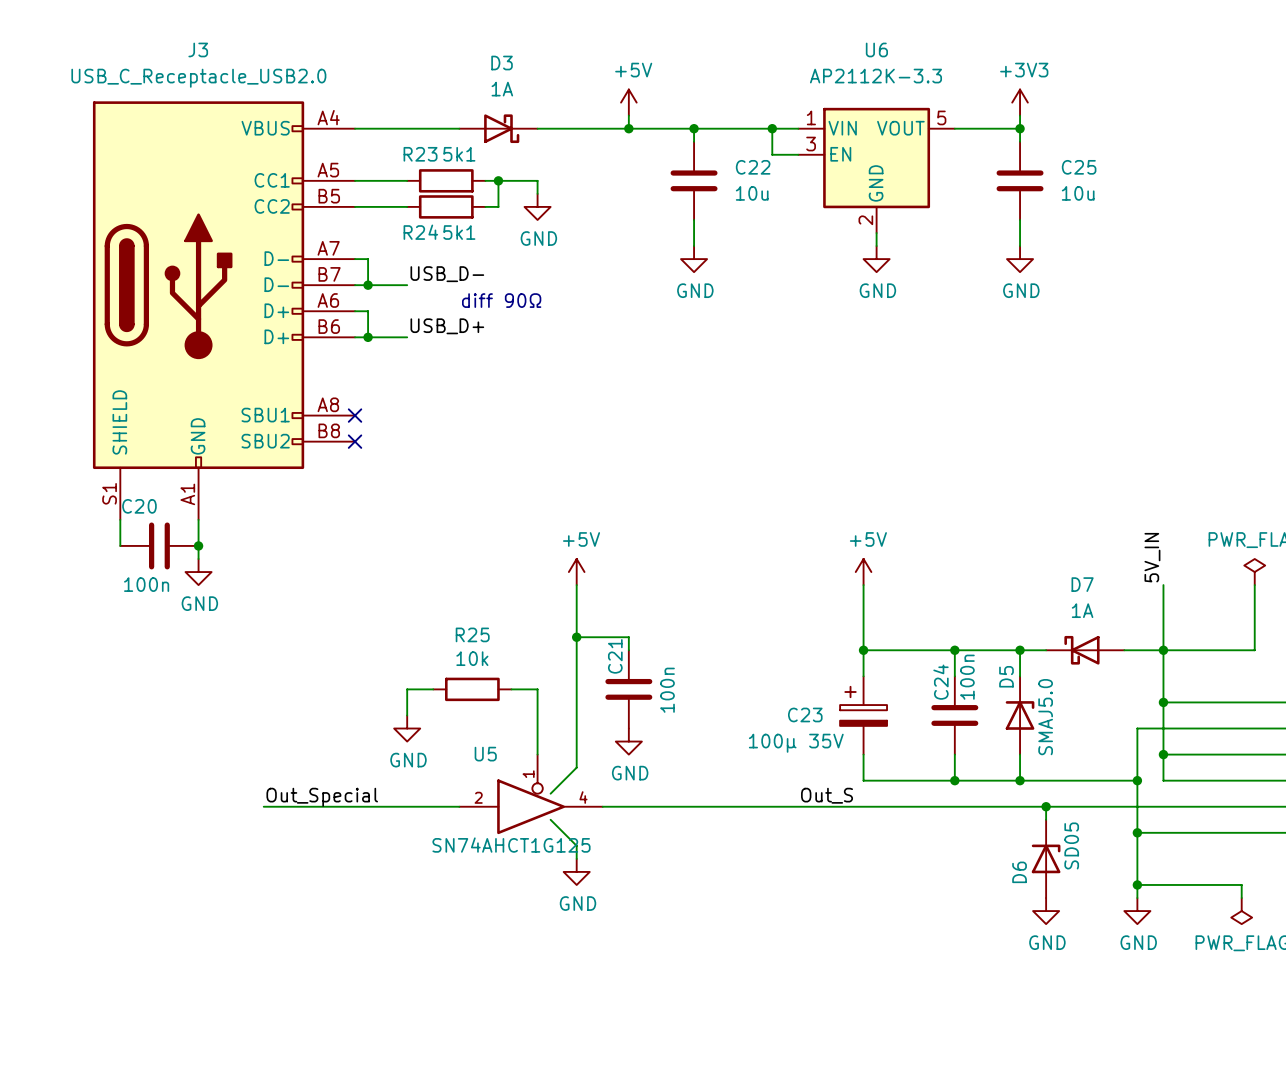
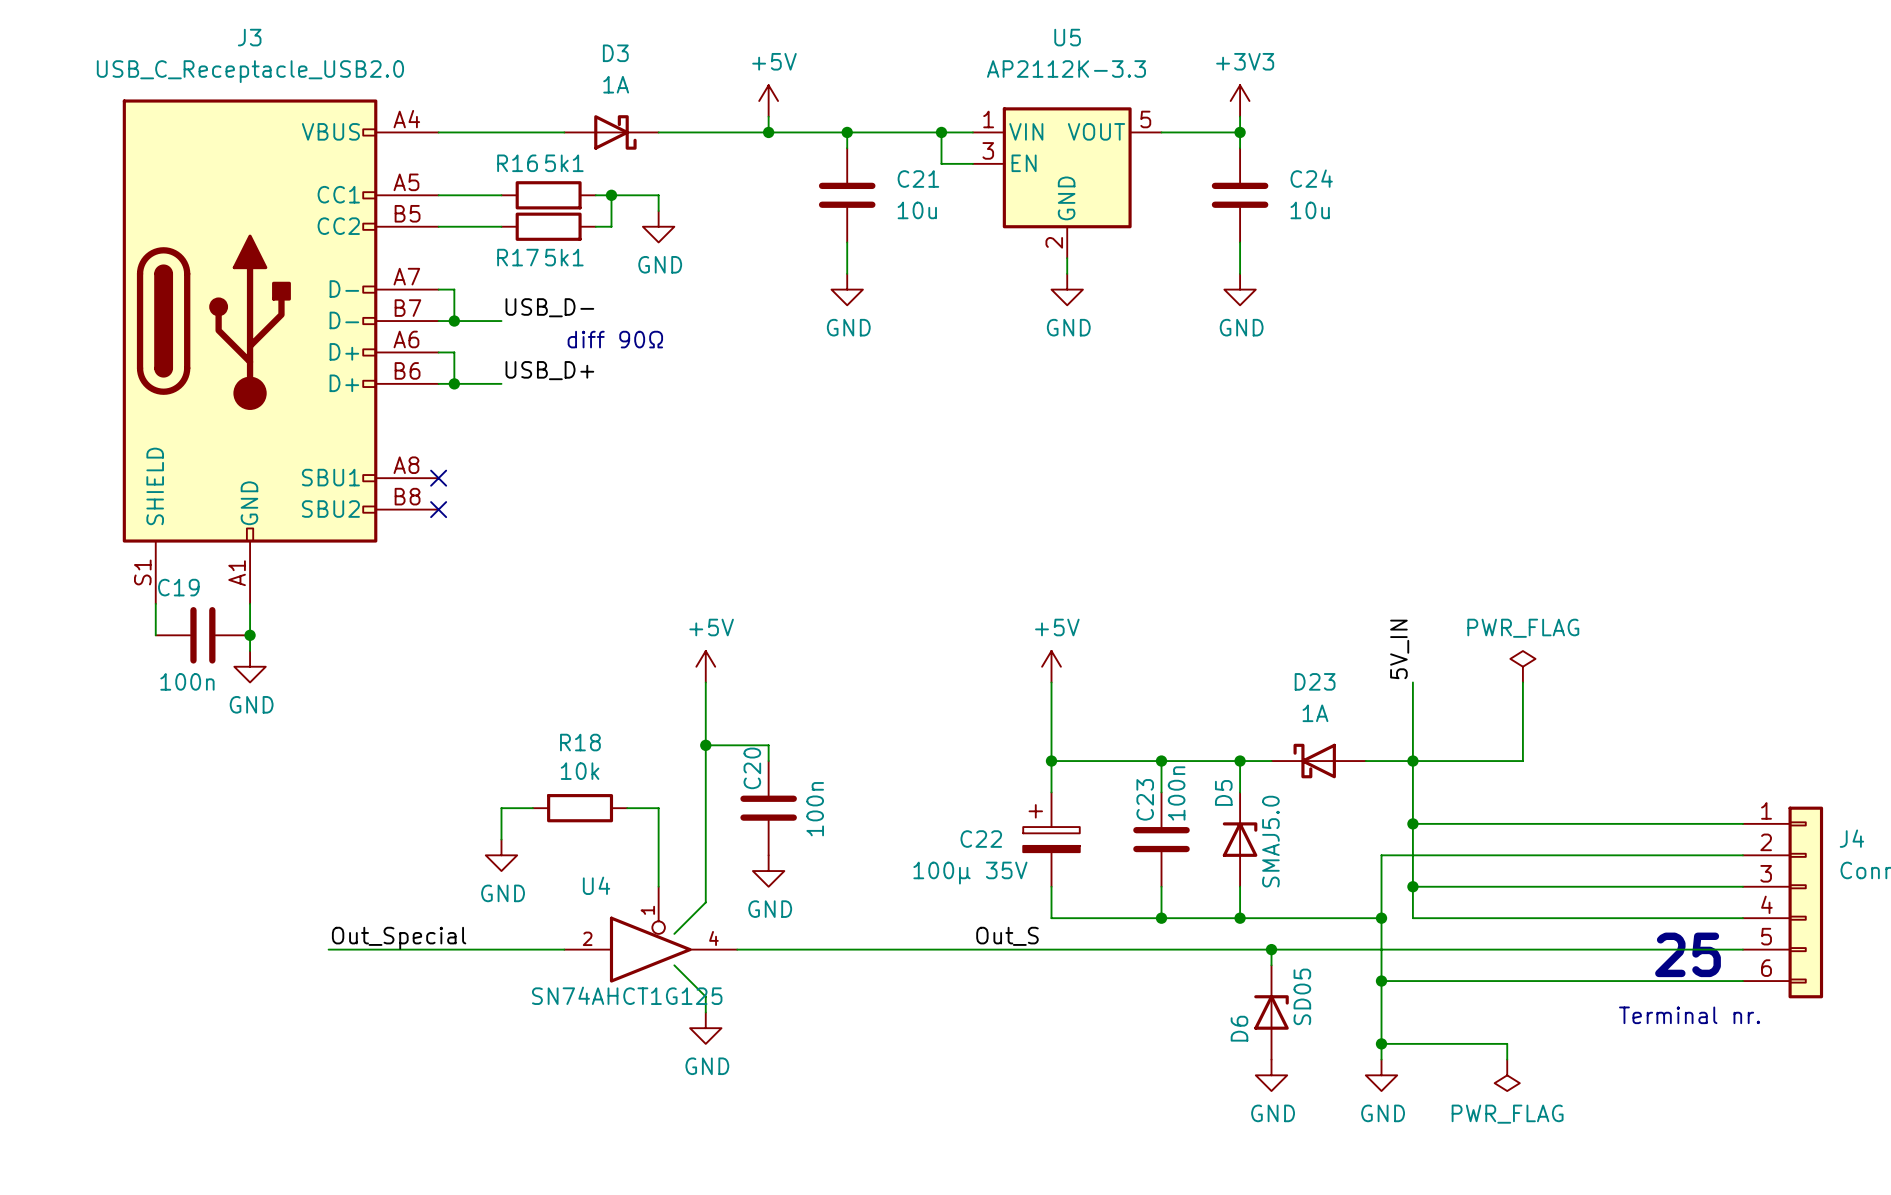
U6 name: U6 (876, 49) -> U5 (1067, 37)
R23 name: R23 (420, 154) -> R16 (517, 163)
C22 name: C22 (753, 167) -> C21 (918, 179)
C25 name: C25 (1079, 167) -> C24 (1311, 178)
R24 name: R24 (420, 232) -> R17 (517, 257)
C20 name: C20 (139, 506) -> C19 (178, 587)
D7 name: D7 (1082, 584) -> D23 (1315, 681)
R25 name: R25 (472, 634) -> R18 (580, 742)
C21 name: C21 (615, 656) -> C20 (752, 768)
C24 name: C24 (941, 682) -> C23 (1145, 799)
C23 name: C23 (805, 714) -> C22 (981, 839)
U5 name: U5 (485, 754) -> U4 (596, 885)

